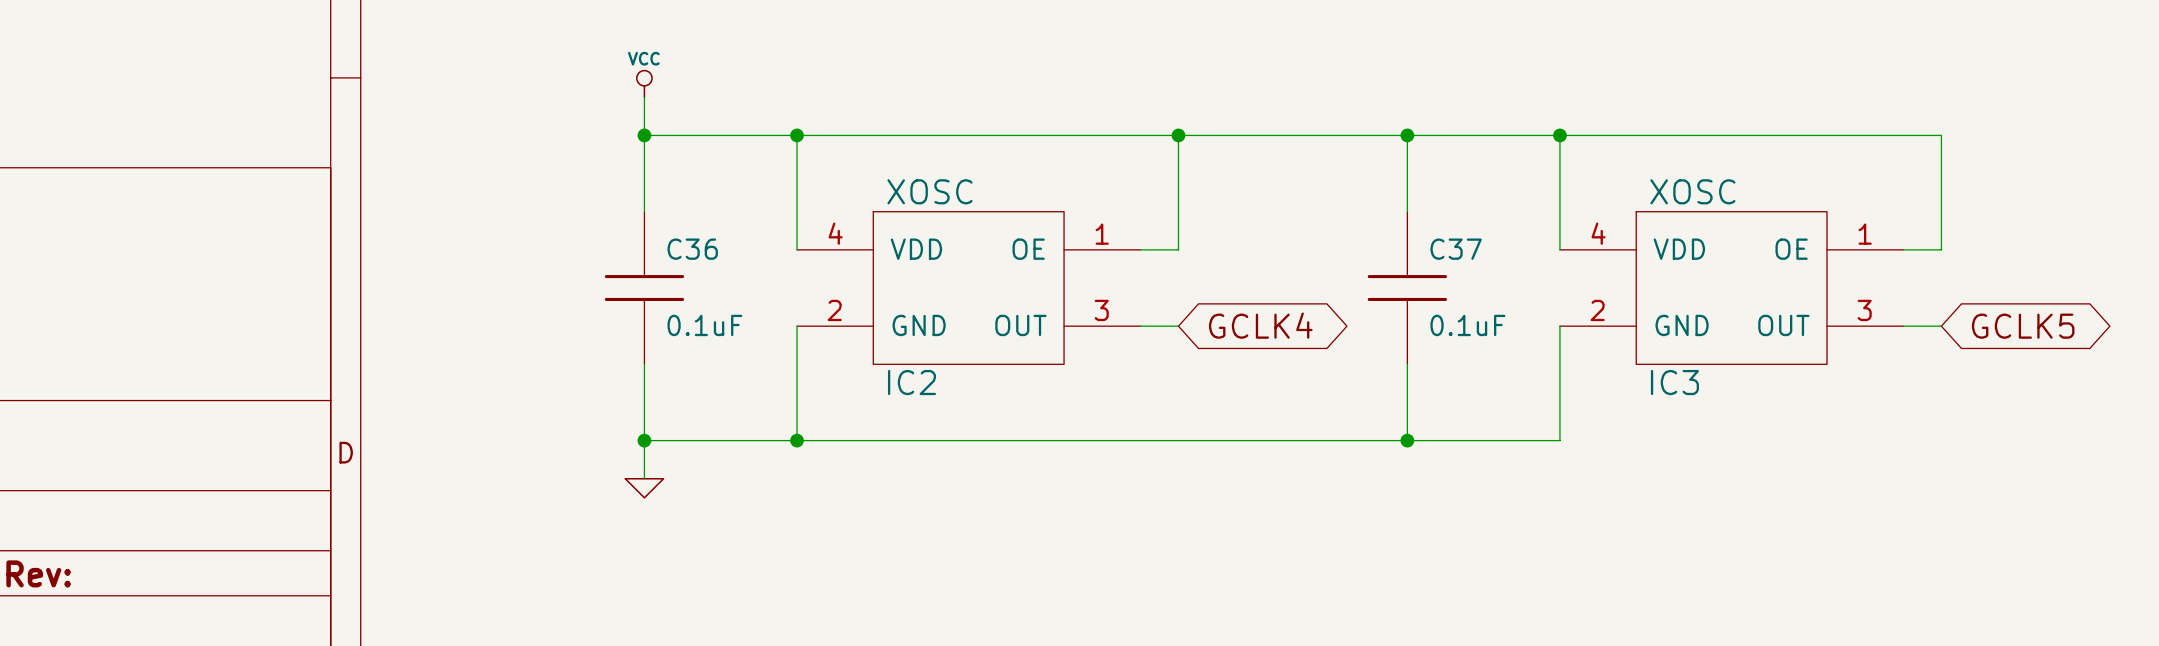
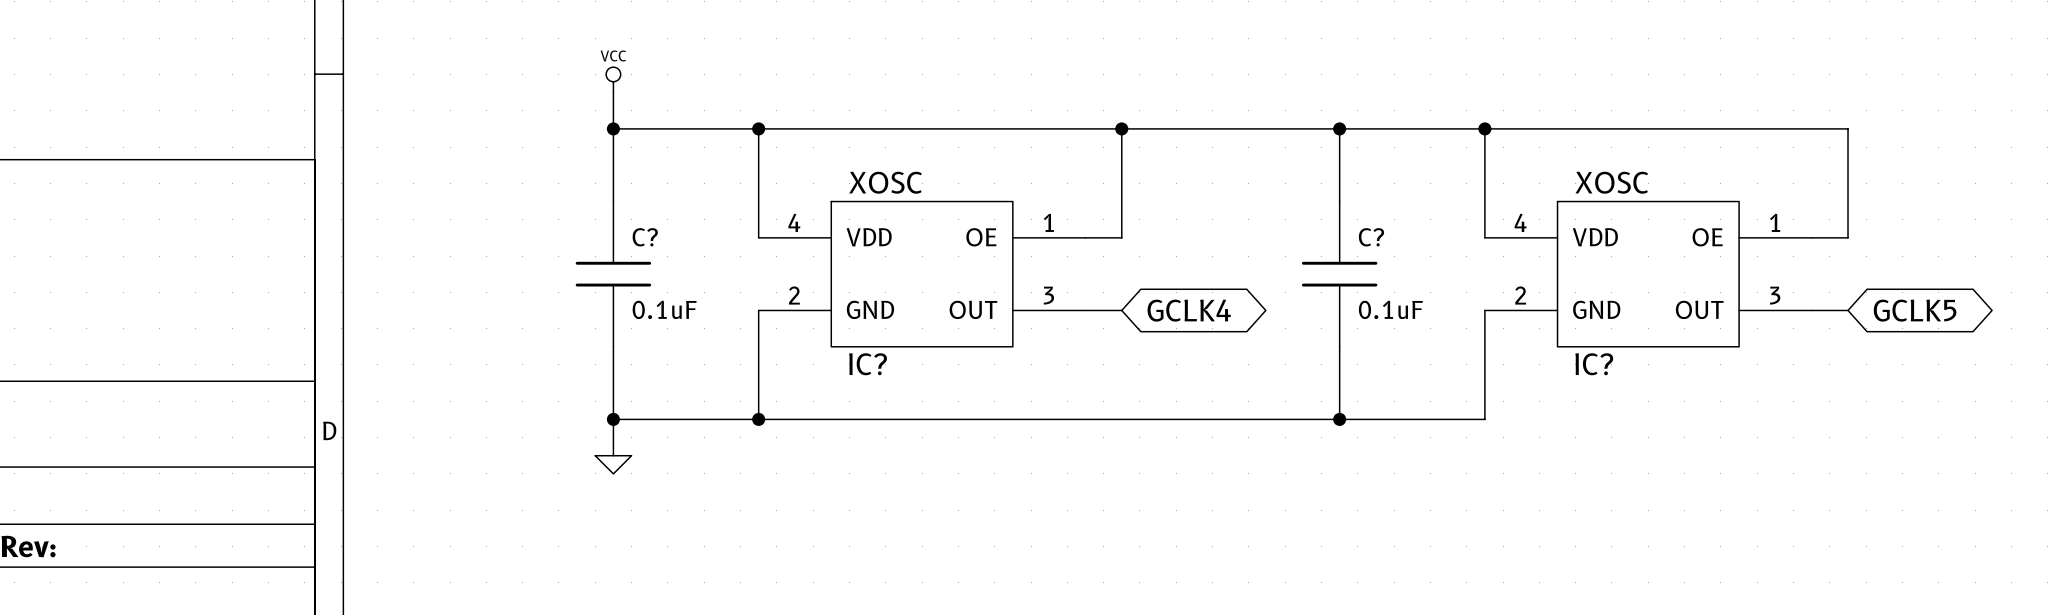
C36 name: C36 (692, 249) -> C? (645, 237)
C37 name: C37 (1456, 249) -> C? (1371, 237)
IC2 name: IC2 (912, 382) -> IC? (868, 364)
IC3 name: IC3 (1674, 382) -> IC? (1594, 364)

